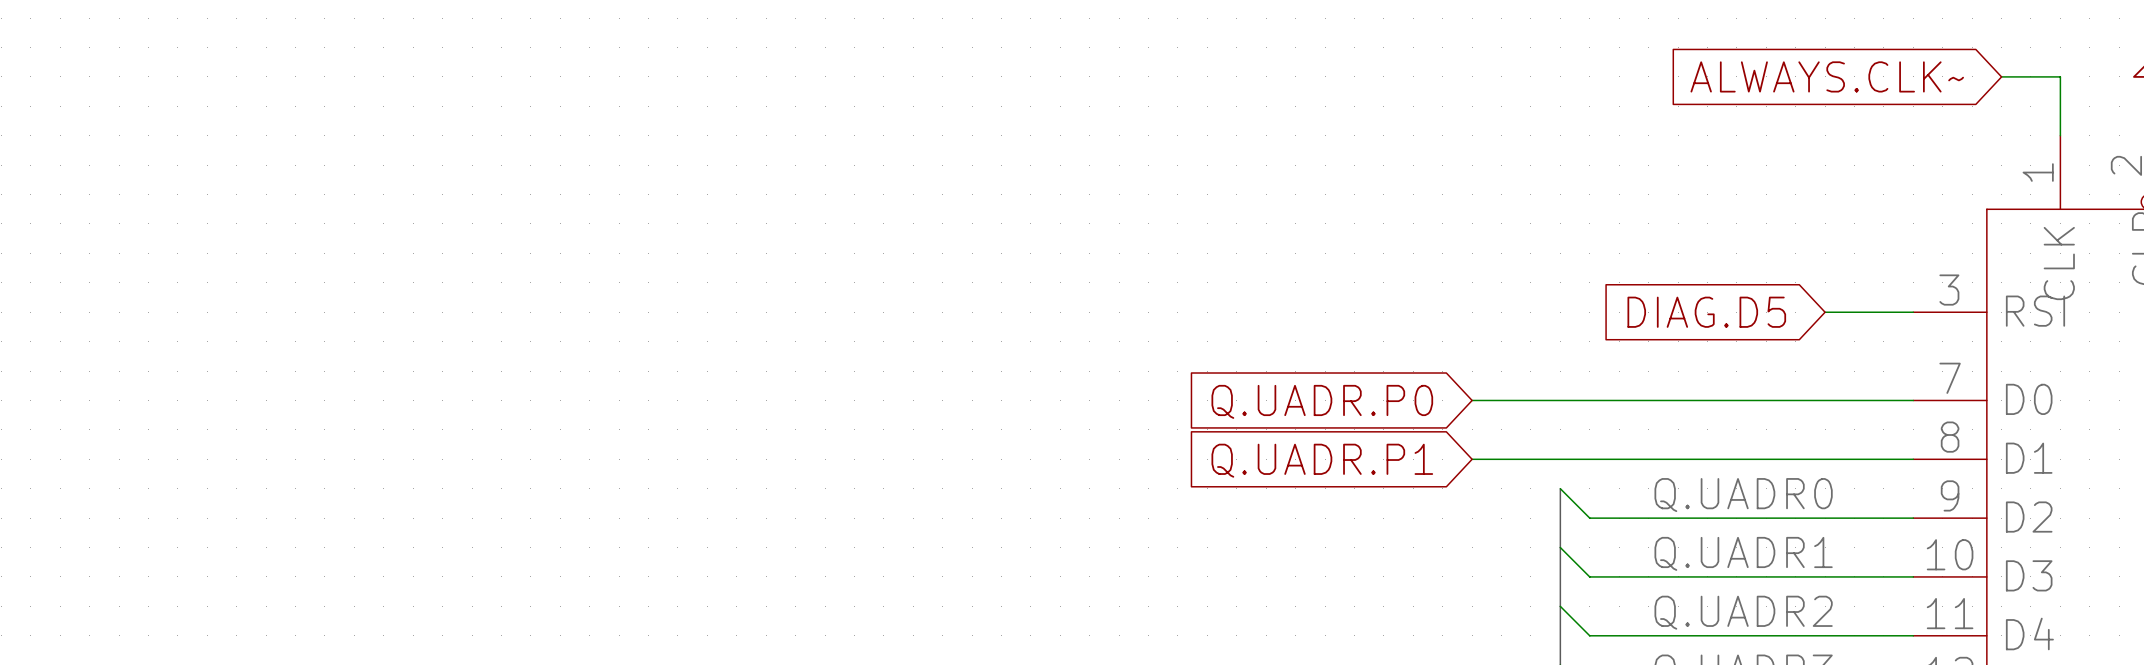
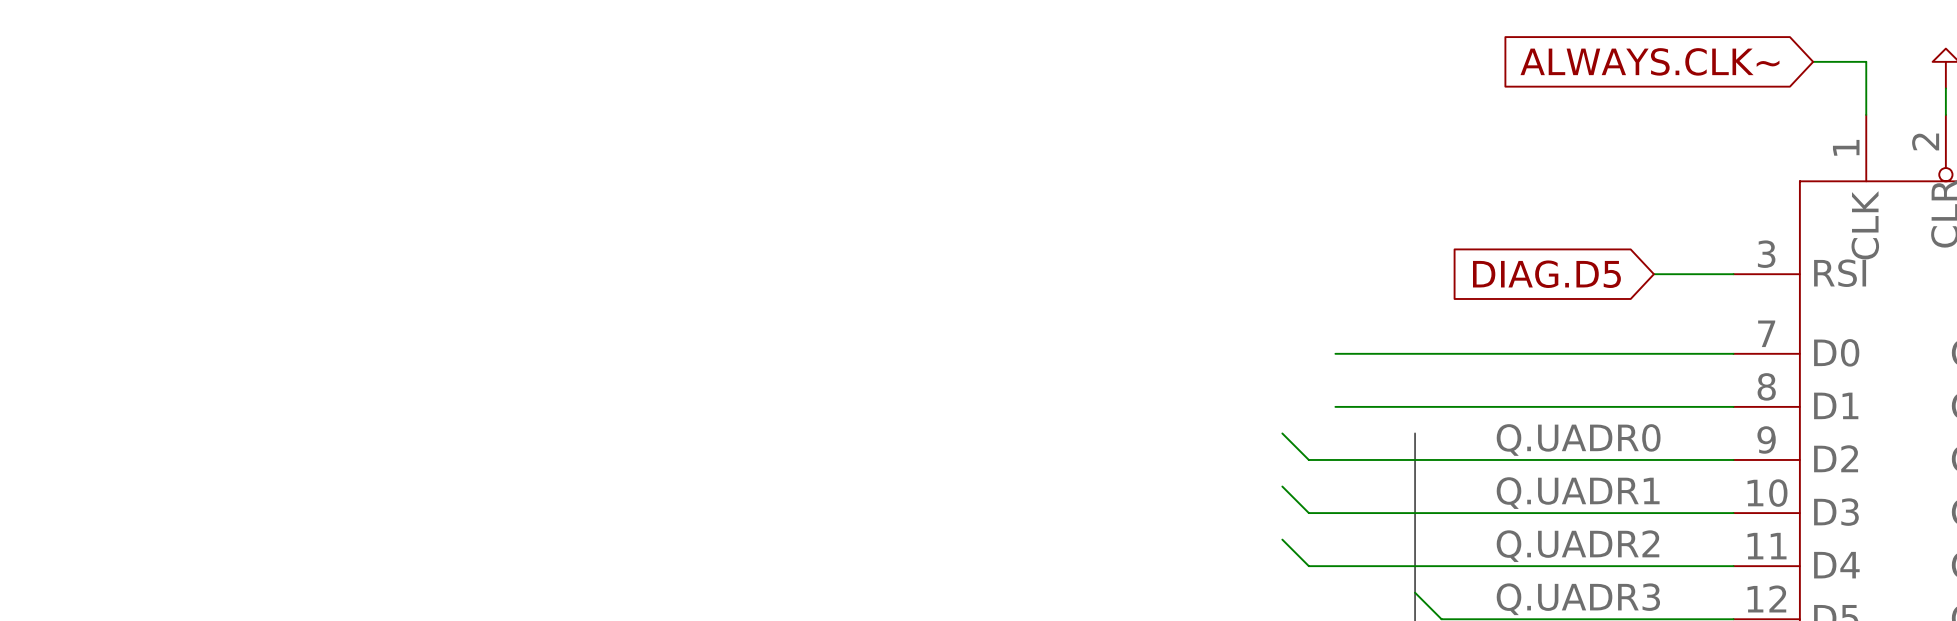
global label: Q.UADR.P0 (1322, 401) -> none
global label: Q.UADR.P1 (1322, 460) -> none
wire: (1560, 488) (1589, 518) -> (1282, 433) (1308, 459) (1441, 459)
wire: (1560, 547) (1589, 576) -> (1282, 486) (1308, 513) (1441, 513)
wire: (1560, 606) (1589, 635) -> (1282, 539) (1308, 566) (1441, 566)

